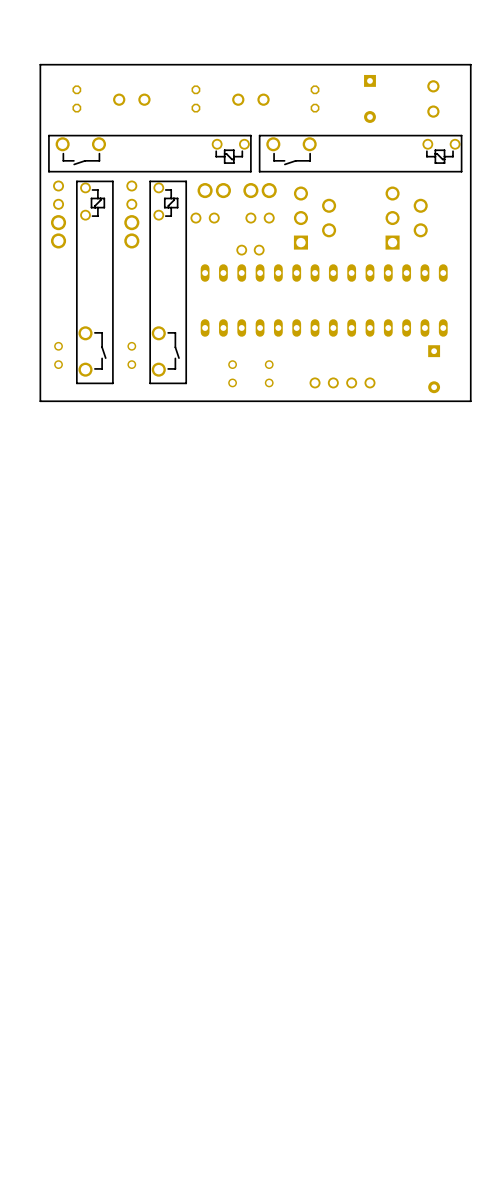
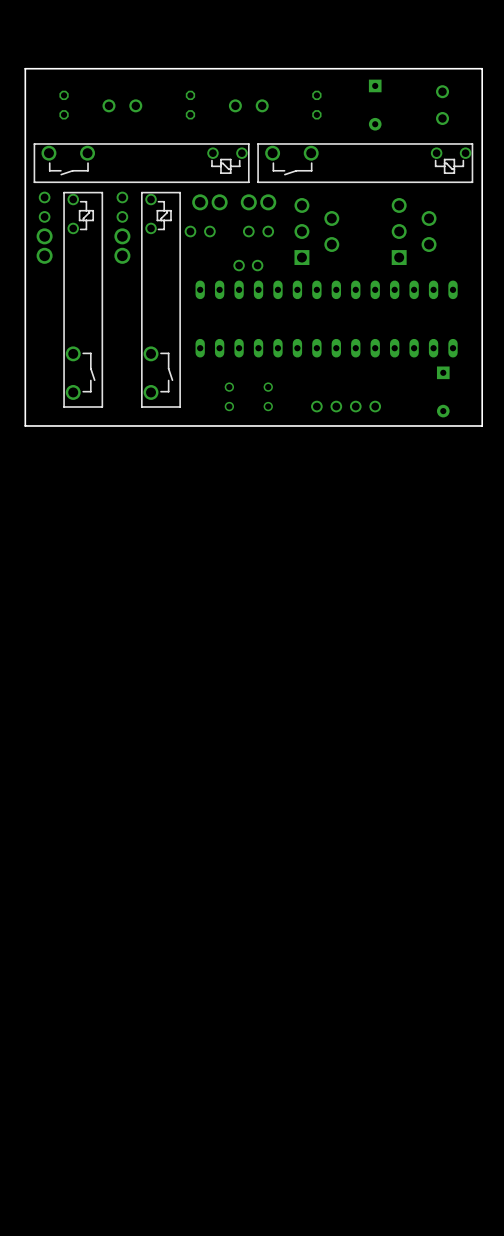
part: (58, 355) -> none
part: (131, 355) -> none

